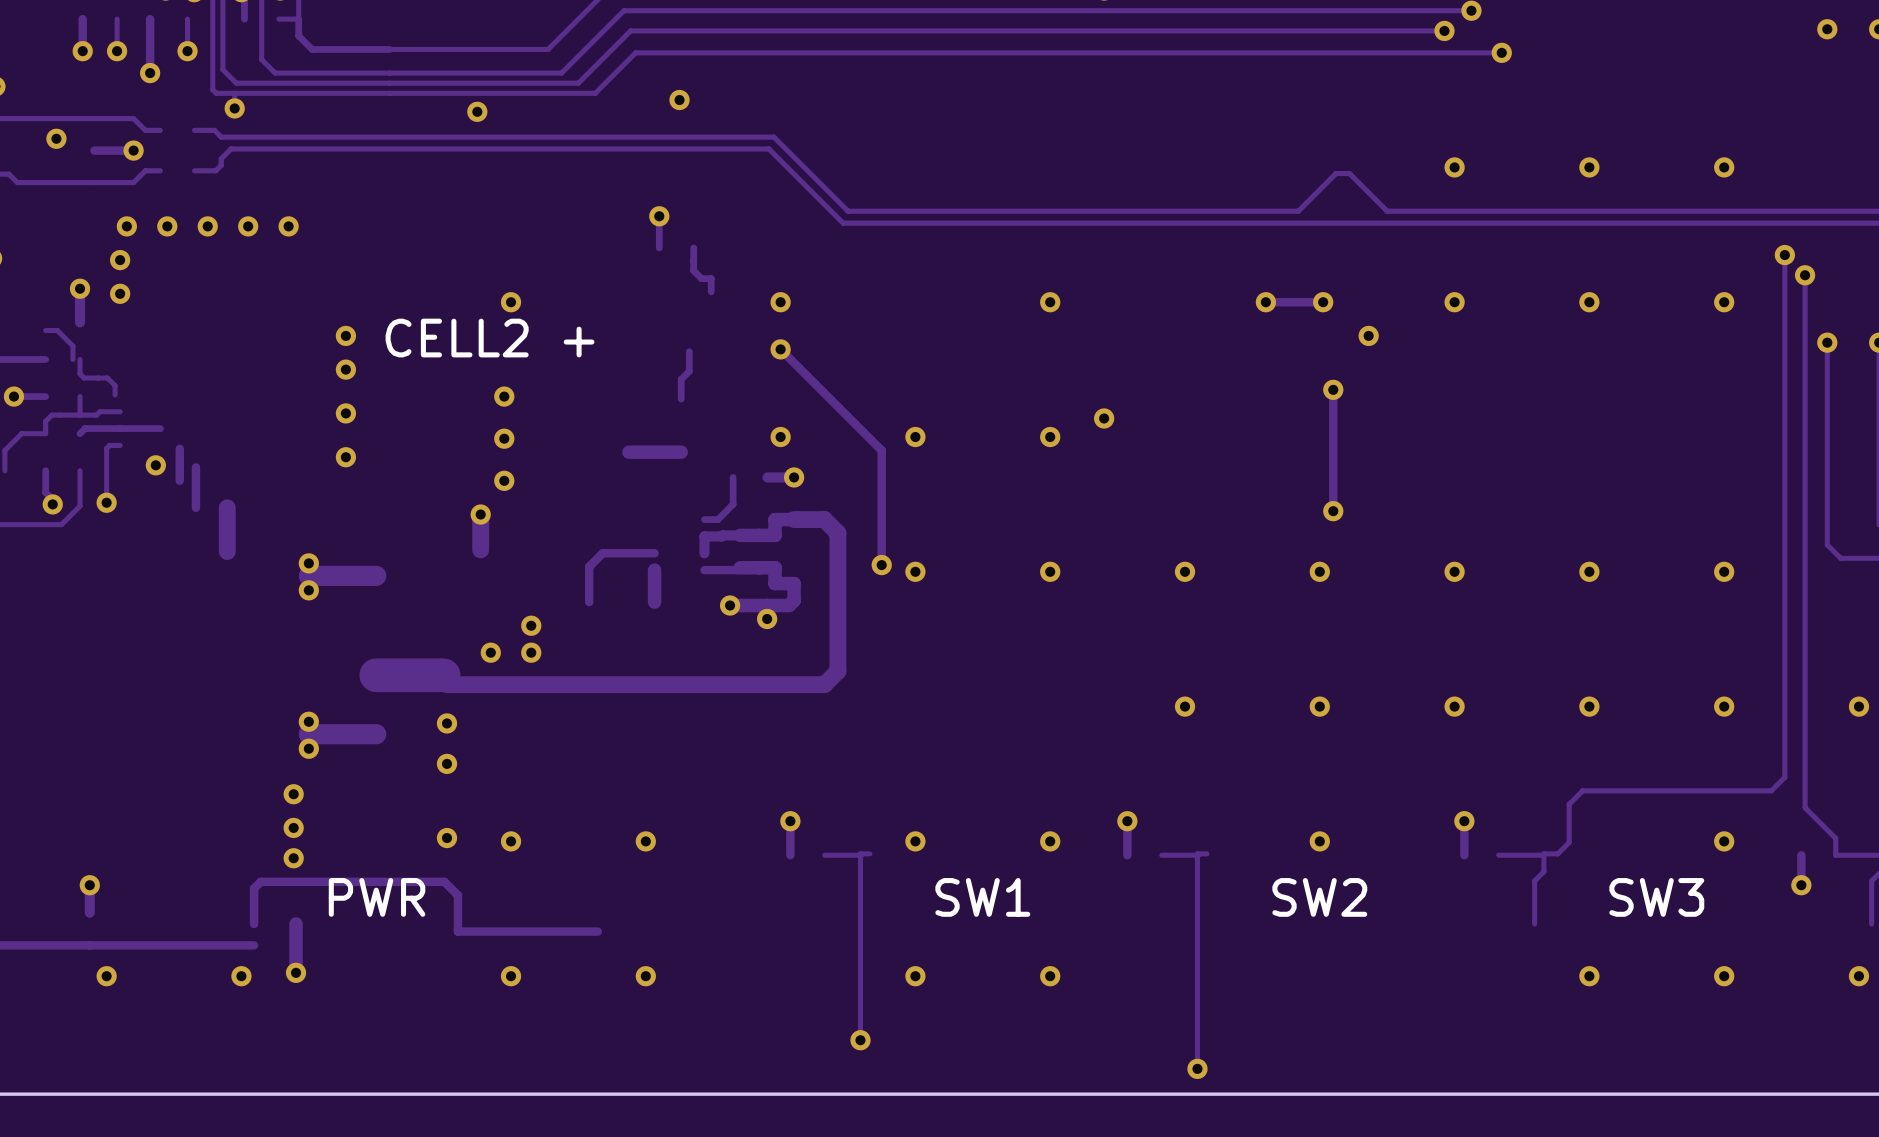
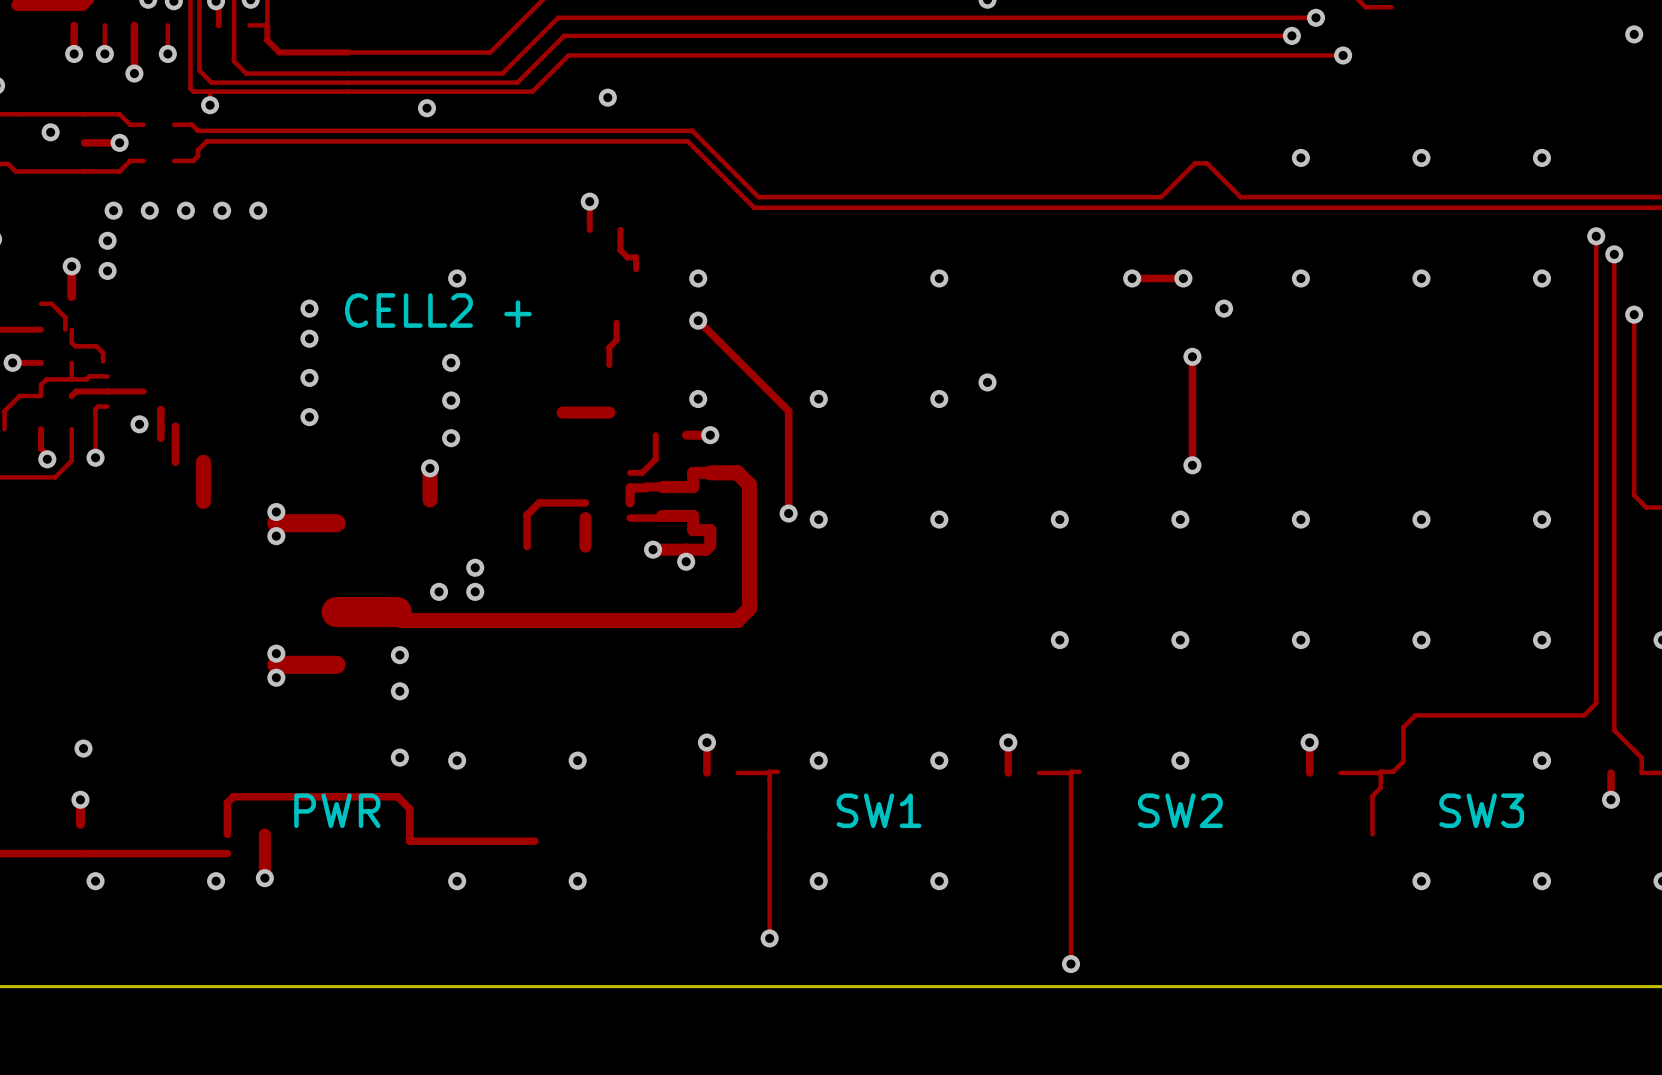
via: (293, 794) -> none
via: none -> (83, 748)
via: (293, 827) -> none
via: (293, 858) -> none

